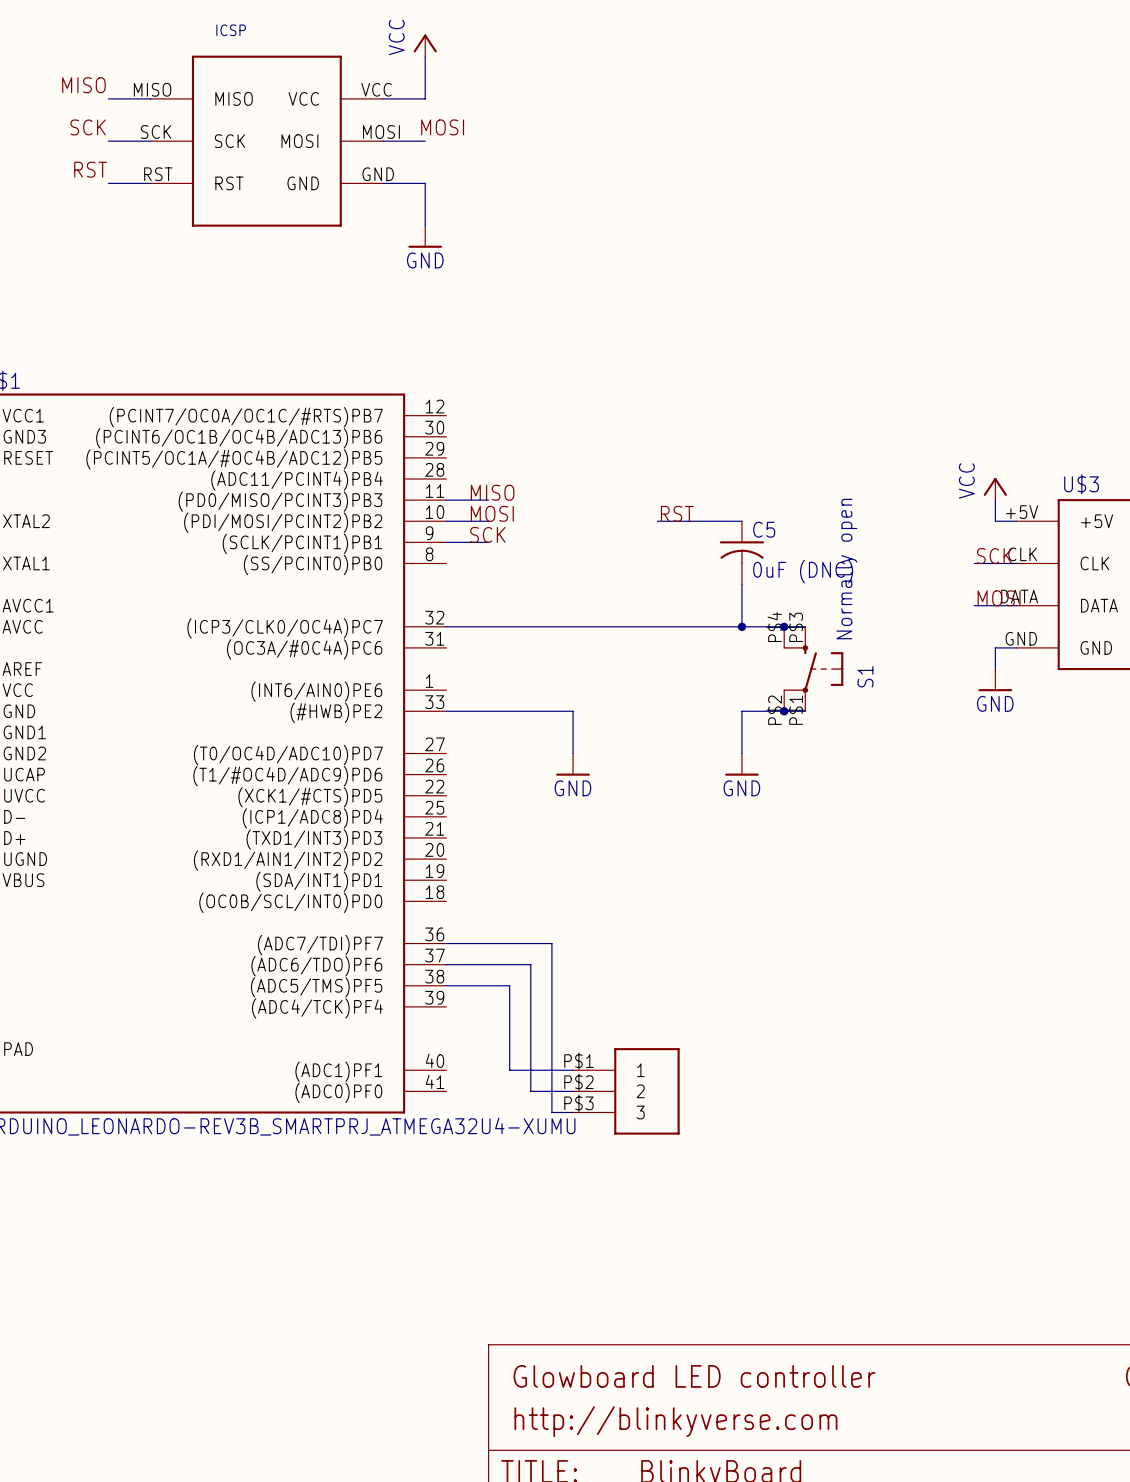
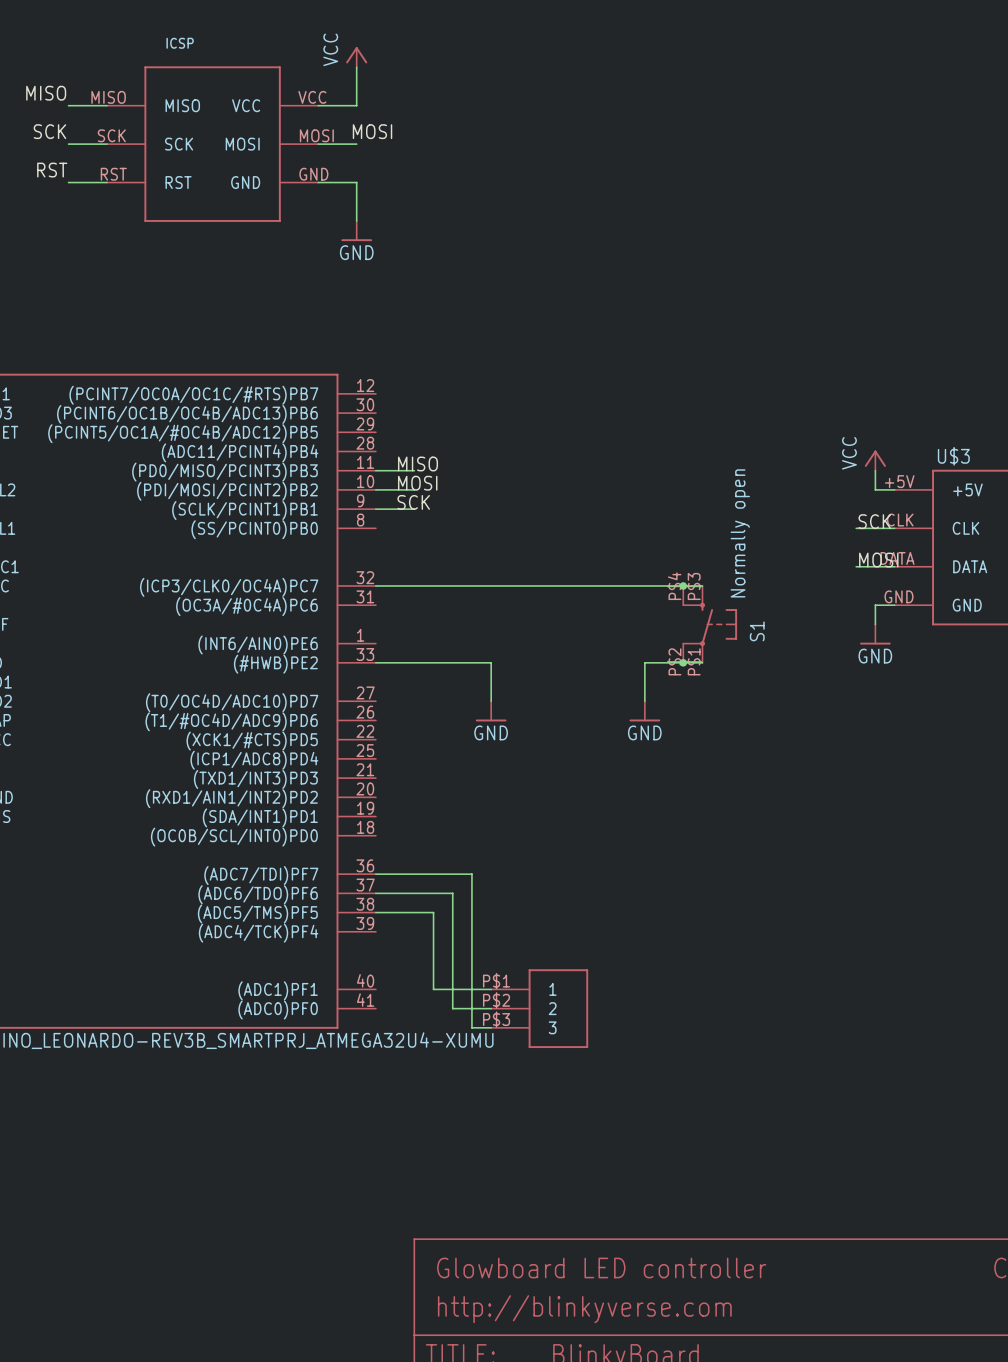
label: RST (677, 513) -> none
wire: (657, 521) (741, 521) -> none
C5: 0uF (DNC) (741, 552) -> none
wire: (741, 584) (741, 626) -> none
junction: (741, 626) -> none

